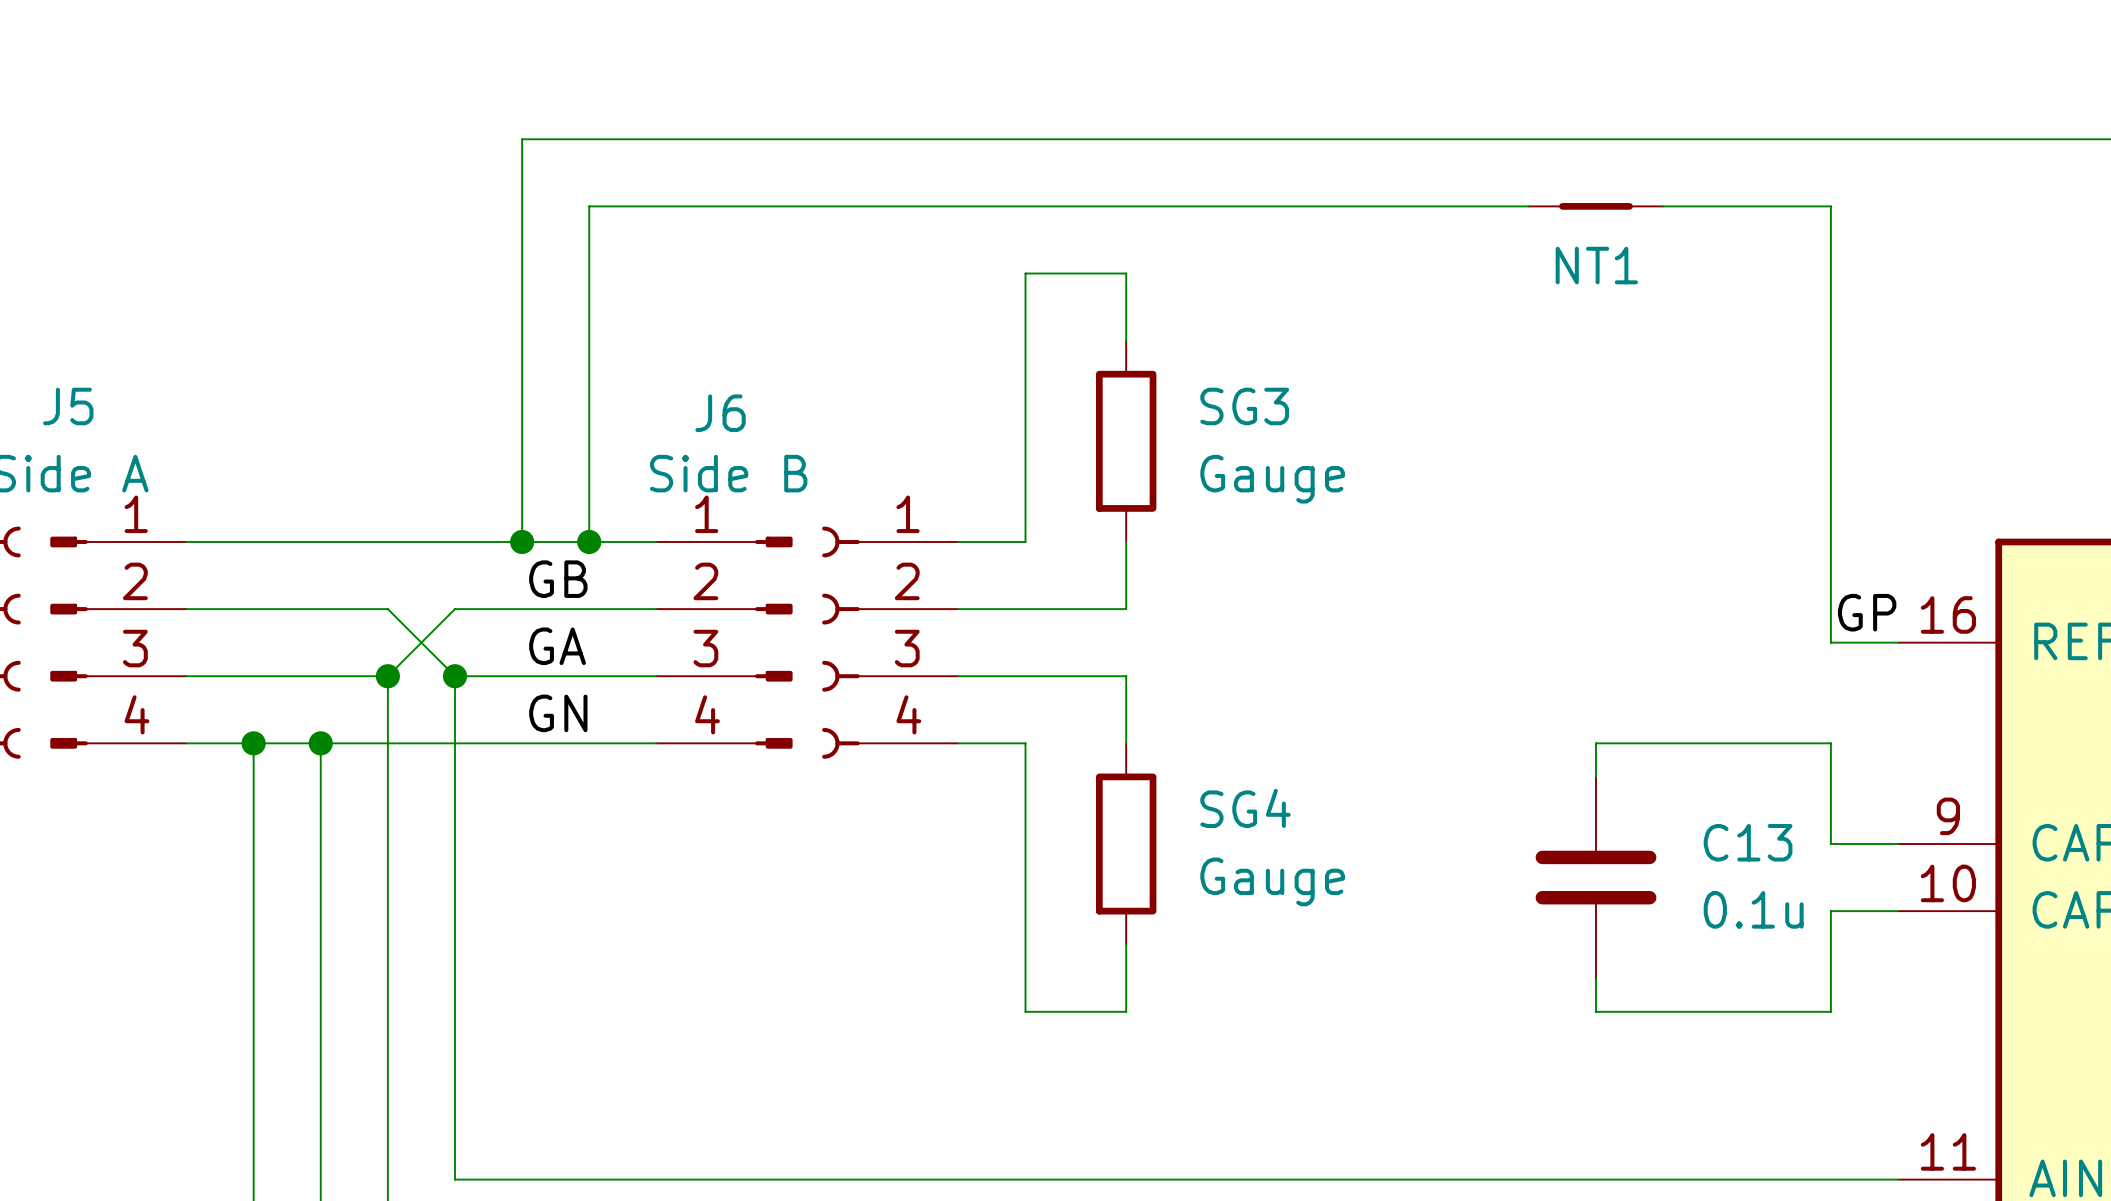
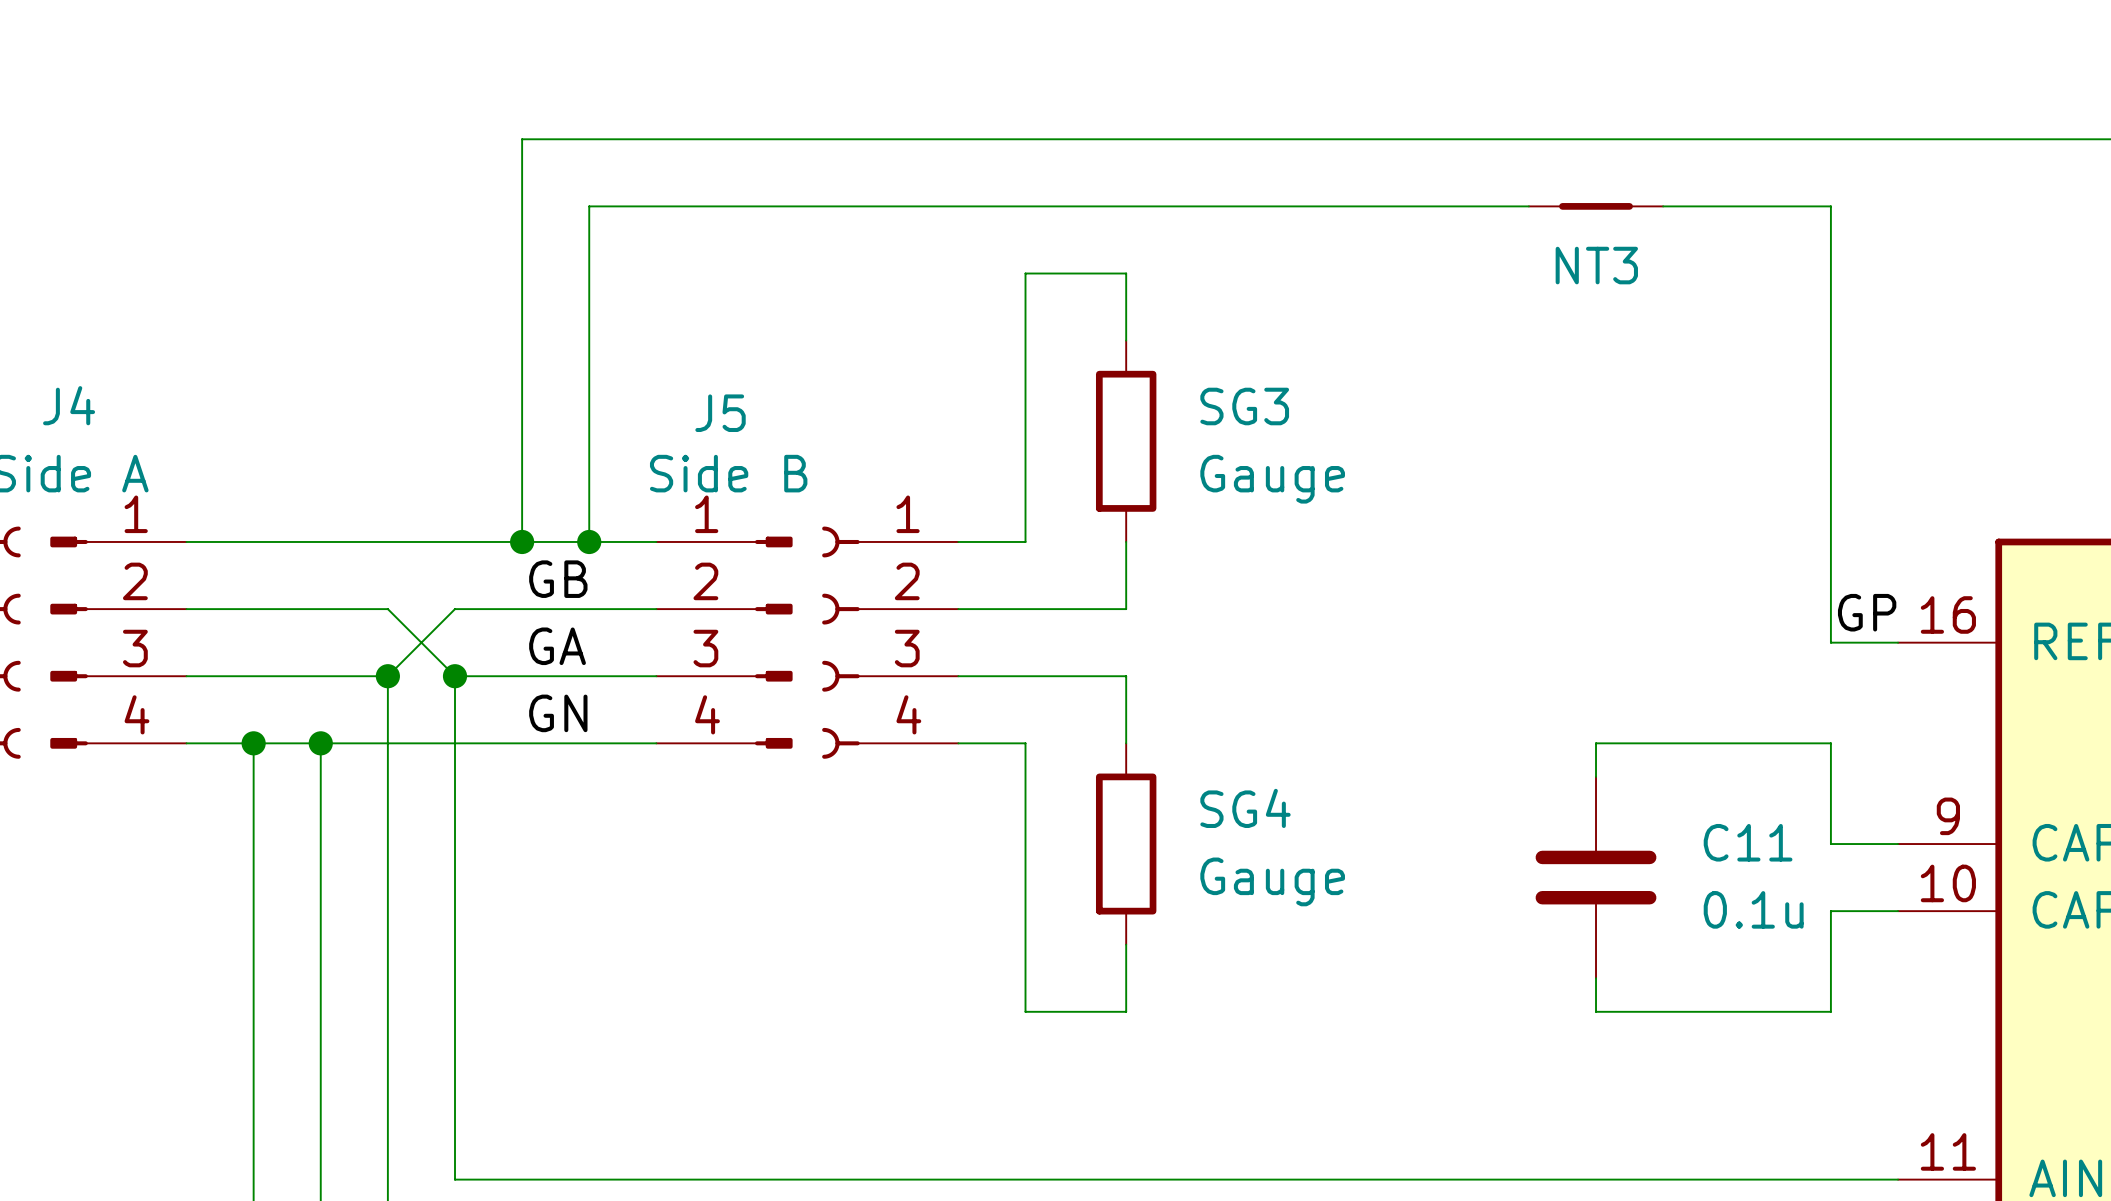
NT1 name: NT1 (1596, 265) -> NT3 (1596, 265)
J5 name: J5 (68, 406) -> J4 (69, 405)
J6 name: J6 (720, 413) -> J5 (720, 413)
C13 name: C13 (1748, 842) -> C11 (1748, 842)

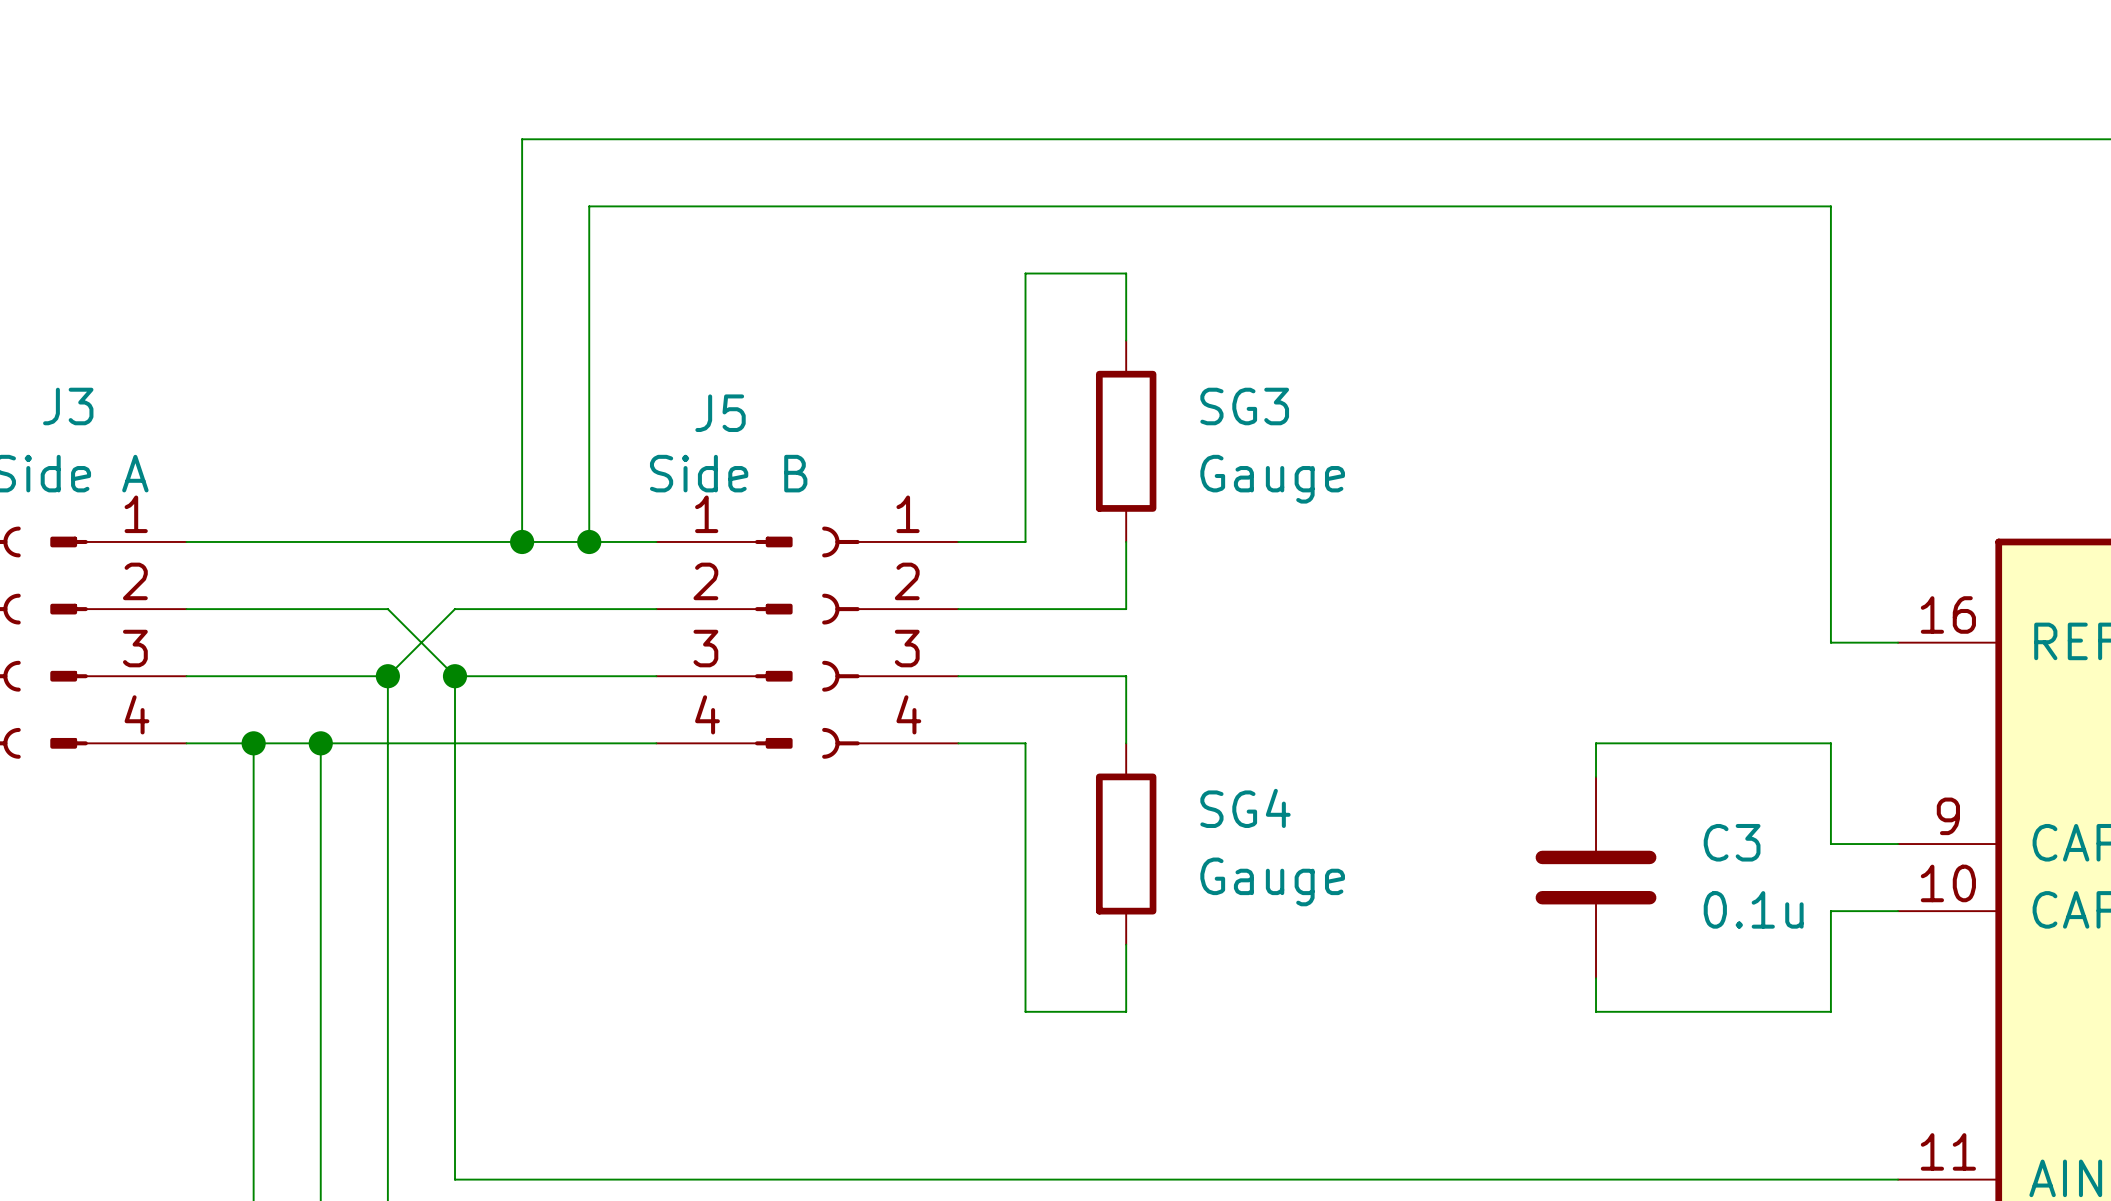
NT3: (1596, 206) -> none
J4 name: J4 (69, 405) -> J3 (68, 406)
label: GB (558, 579) -> none
label: GP (1867, 612) -> none
label: GA (557, 646) -> none
label: GN (558, 713) -> none
C11 name: C11 (1748, 842) -> C3 (1732, 842)

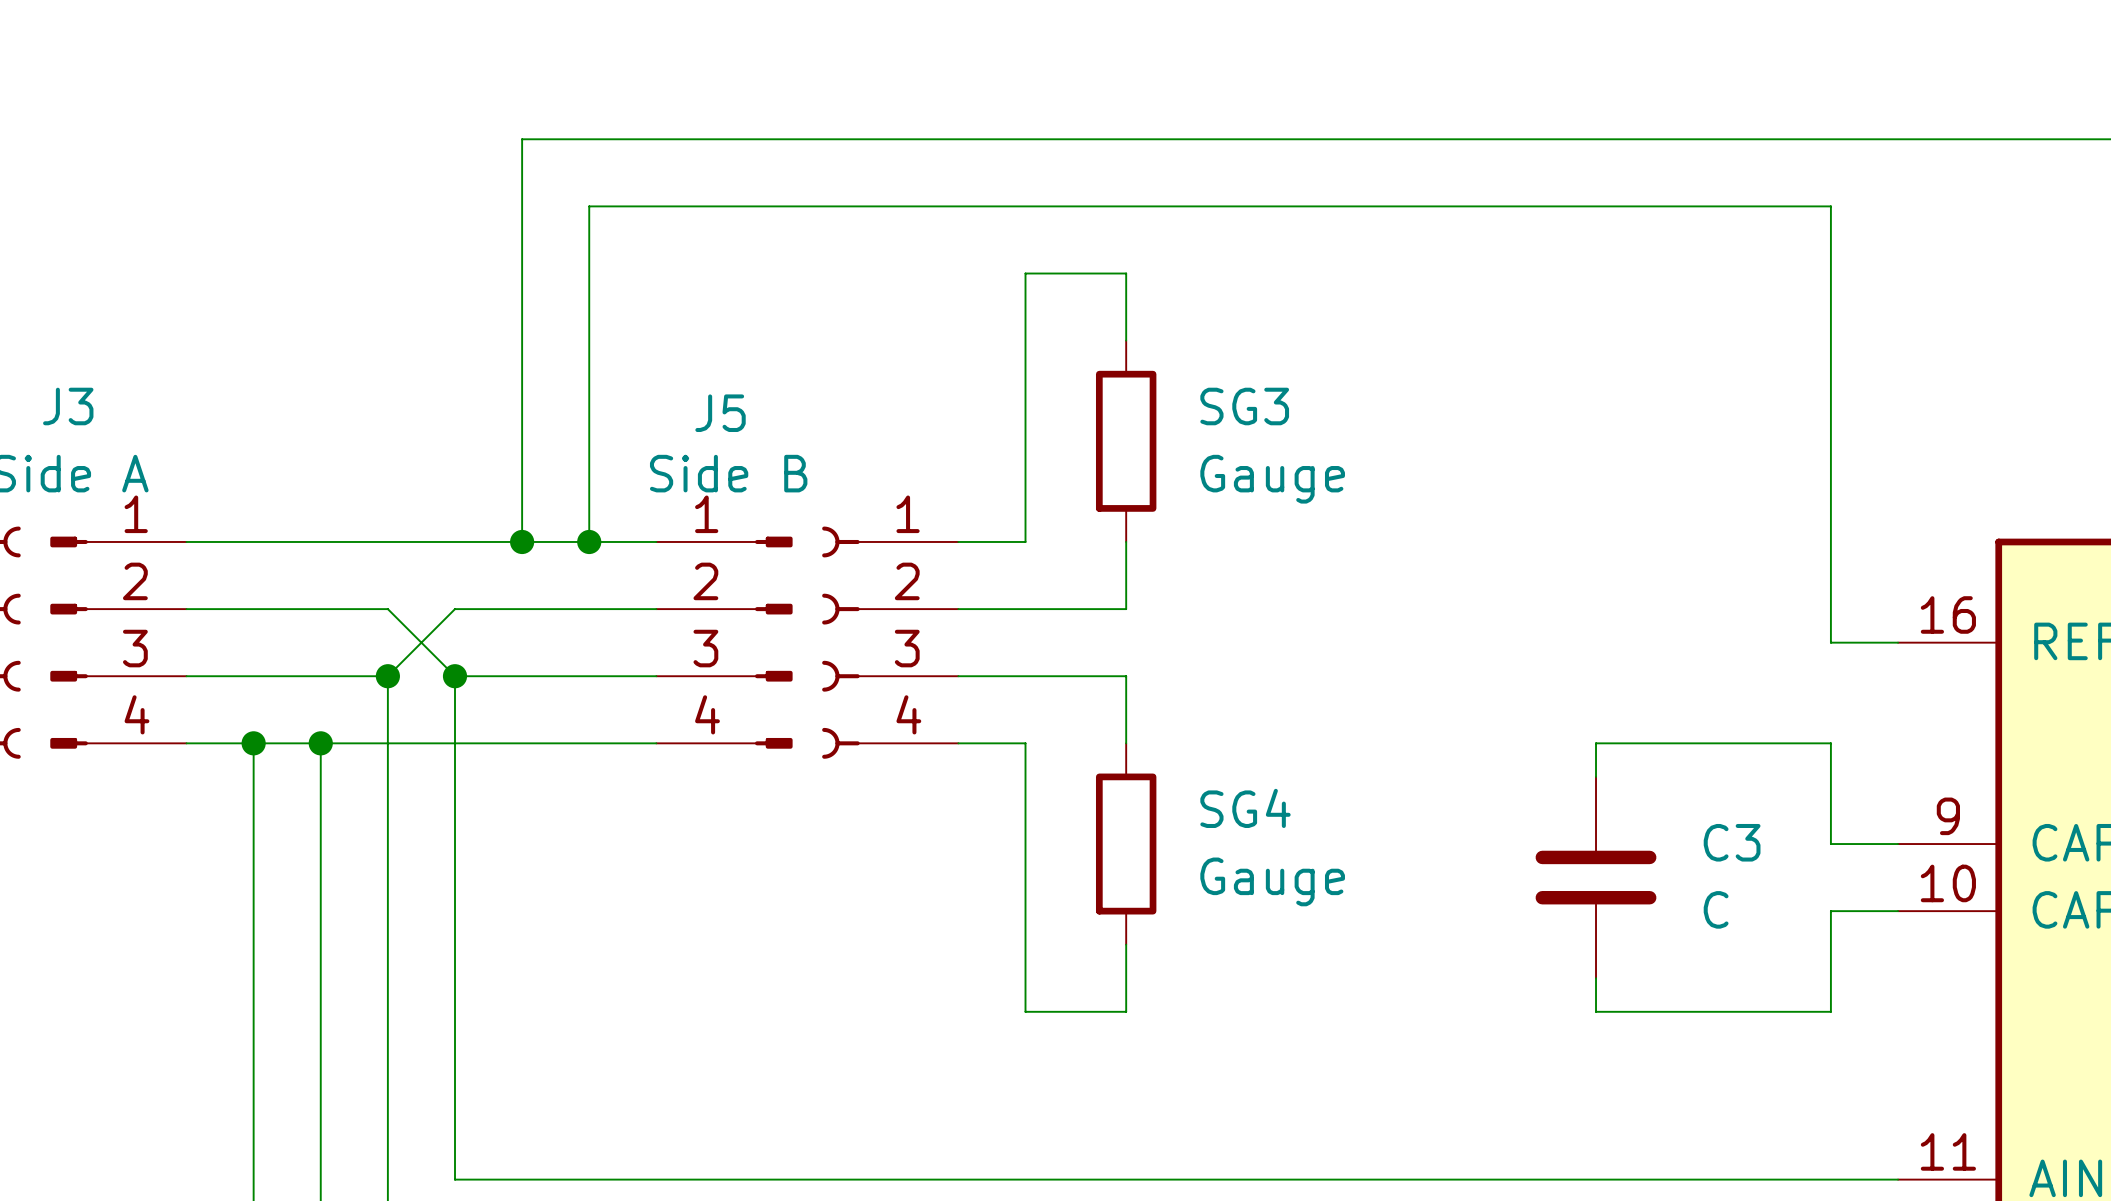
C3 value: 0.1u (1753, 909) -> C (1716, 909)

